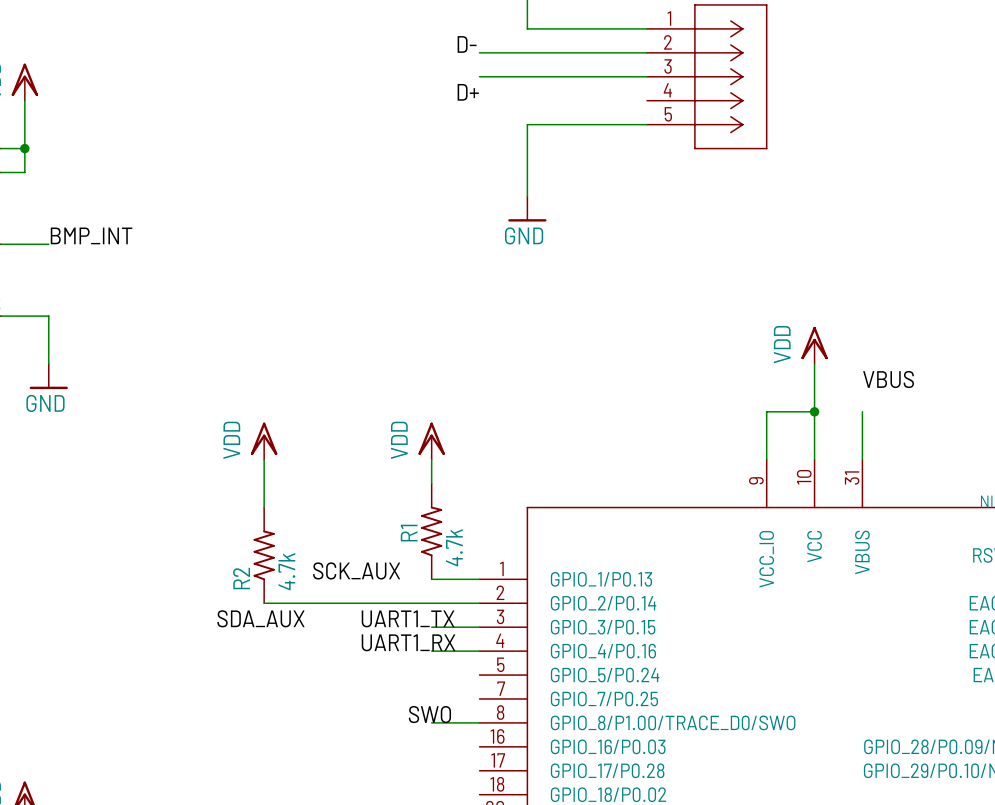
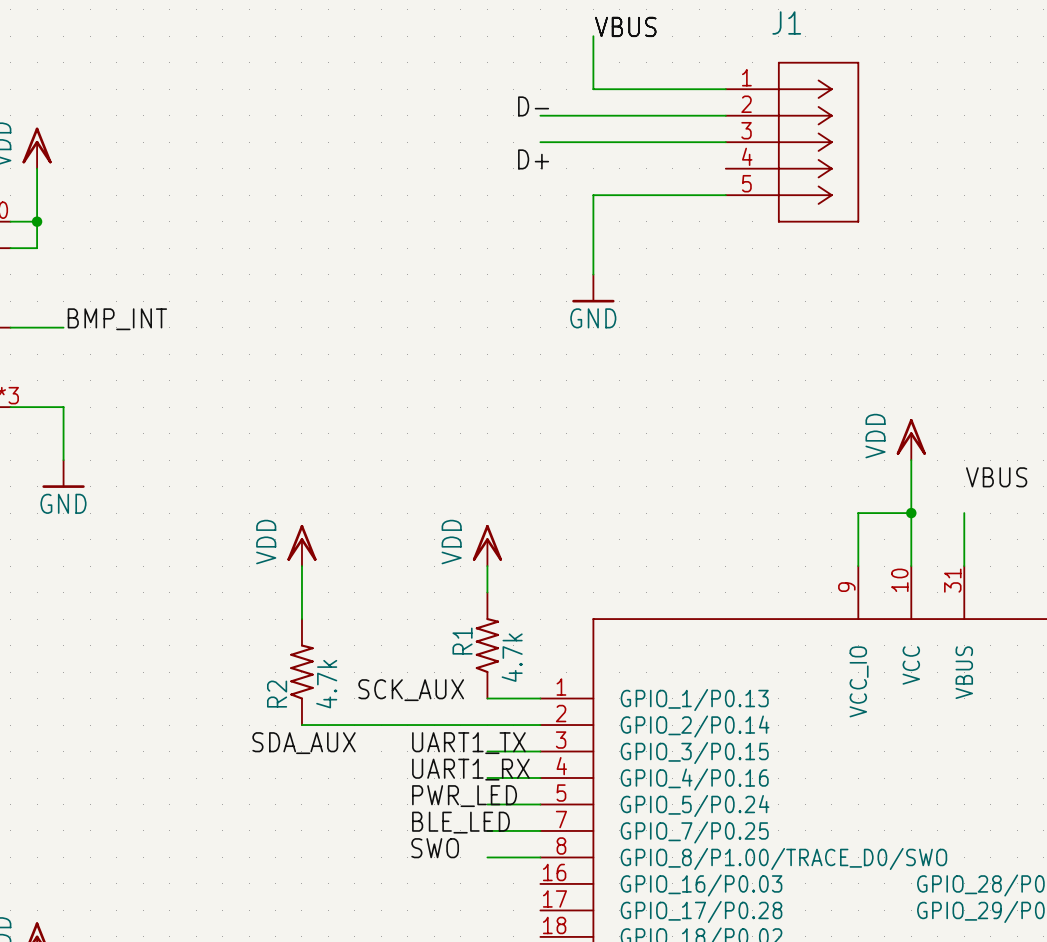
label: none -> PWR_LED (464, 796)
wire: none -> (487, 804) (540, 804)
label: none -> BLE_LED (460, 822)
wire: none -> (487, 830) (540, 830)
label position: SWO (429, 714) -> SWO (435, 848)

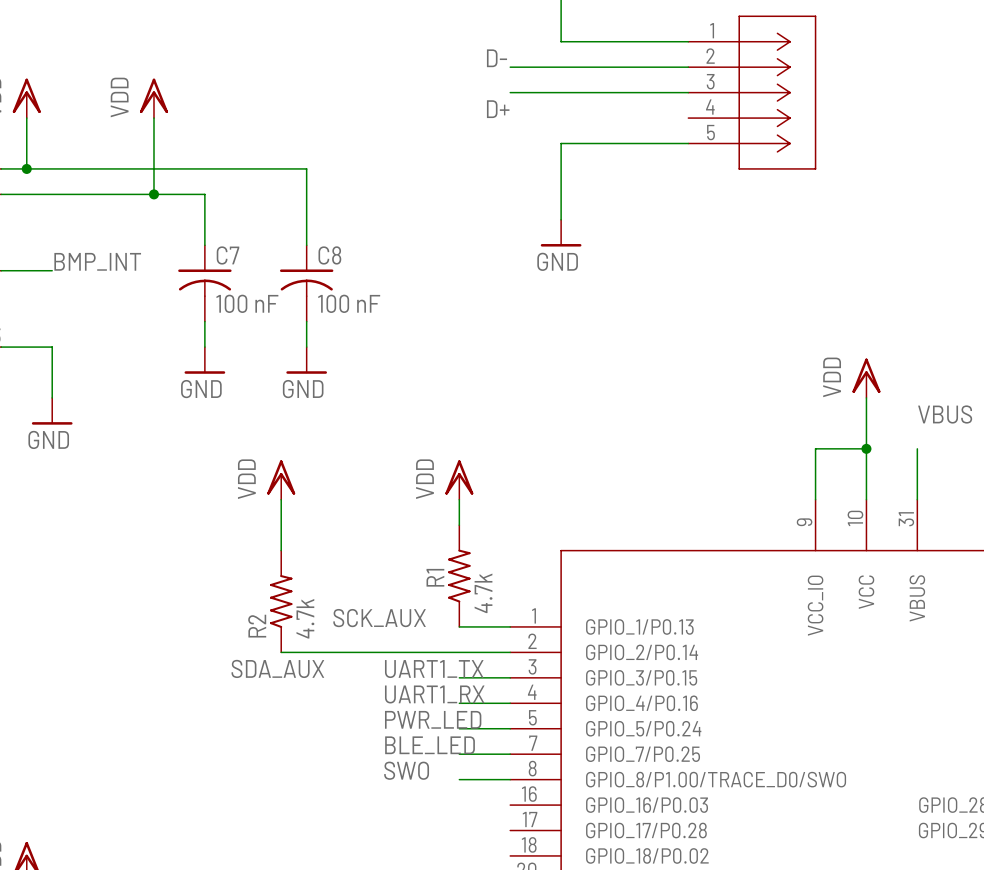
power symbol: none -> VDD (153, 98)
wire: none -> (153, 118) (153, 194)
wire: (37, 221) (37, 248) -> (204, 245) (204, 194) (26, 194)
wire: none -> (26, 168) (306, 168) (306, 245)
junction: none -> (153, 194)
C7: none -> 100 nF (204, 283)
C8: none -> 100 nF (306, 283)
wire: none -> (204, 321) (204, 347)
wire: none -> (306, 321) (306, 347)
power symbol: none -> GND (204, 360)
power symbol: none -> GND (306, 360)

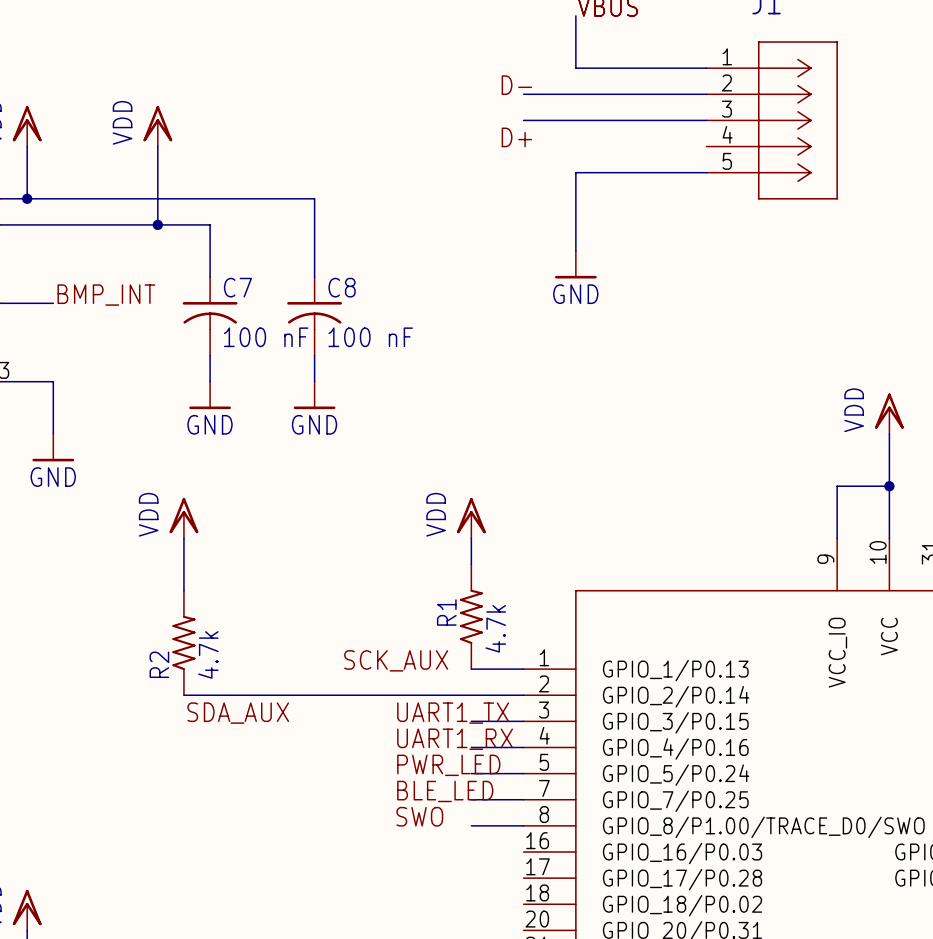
power symbol position: VDD (281, 480) -> VDD (183, 518)
wire: (281, 499) (281, 550) -> (183, 538) (183, 590)
R2 position: (281, 601) -> (183, 642)
wire: none -> (183, 695) (288, 695)
label position: SDA_AUX (277, 668) -> SDA_AUX (238, 713)

